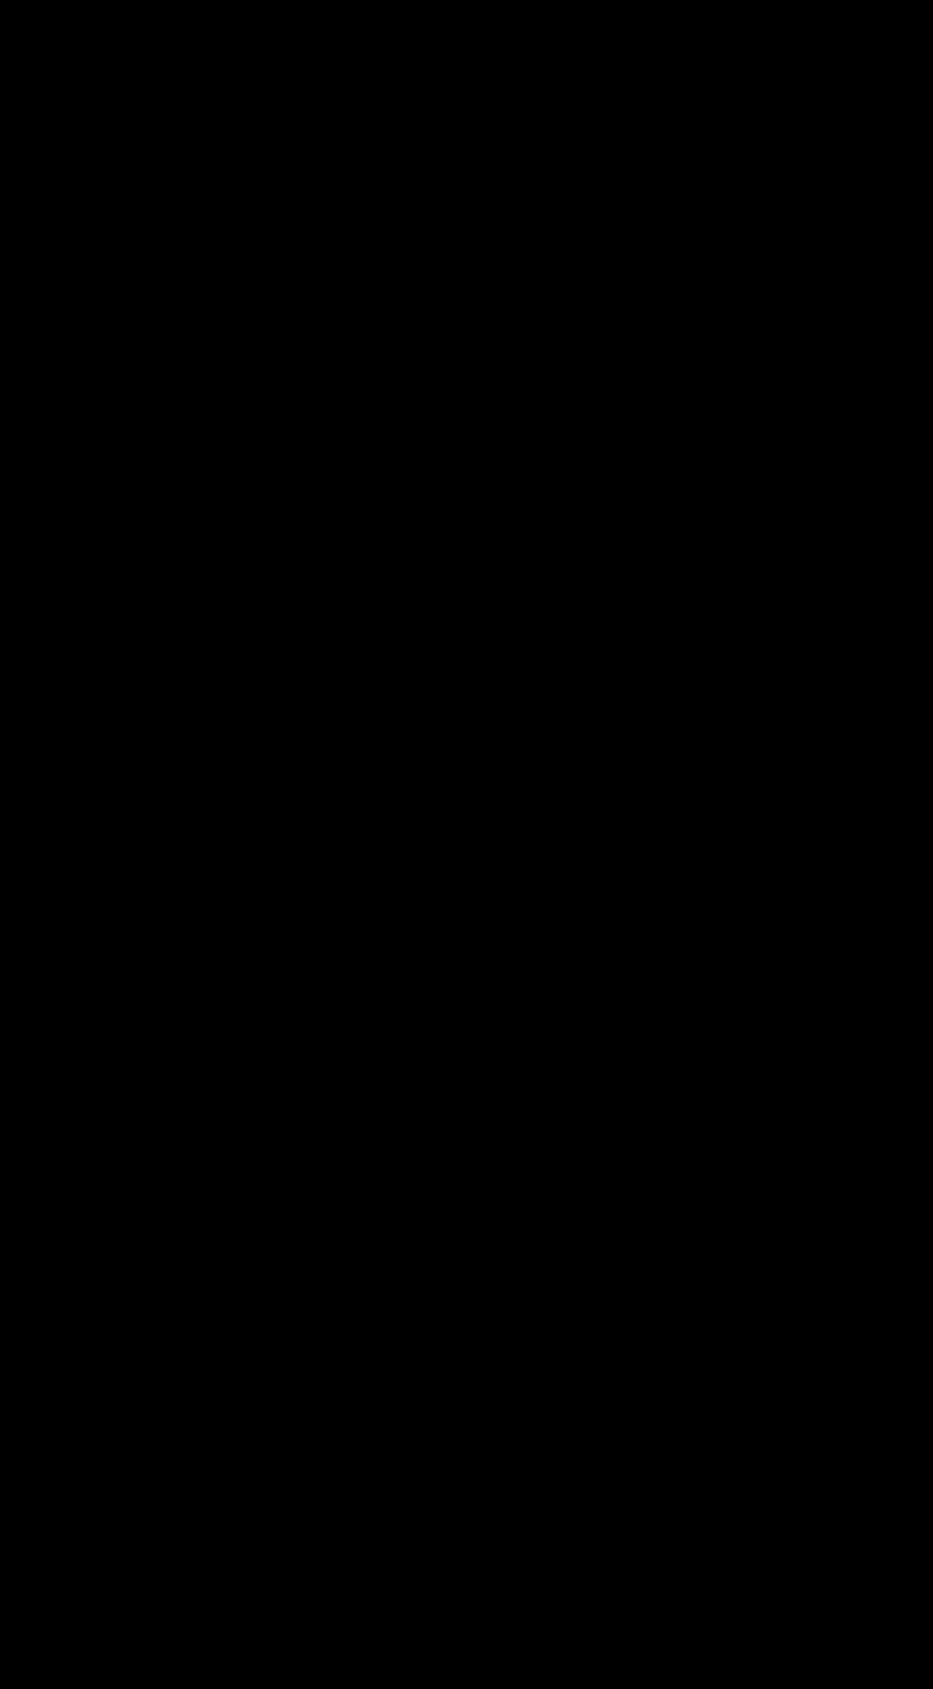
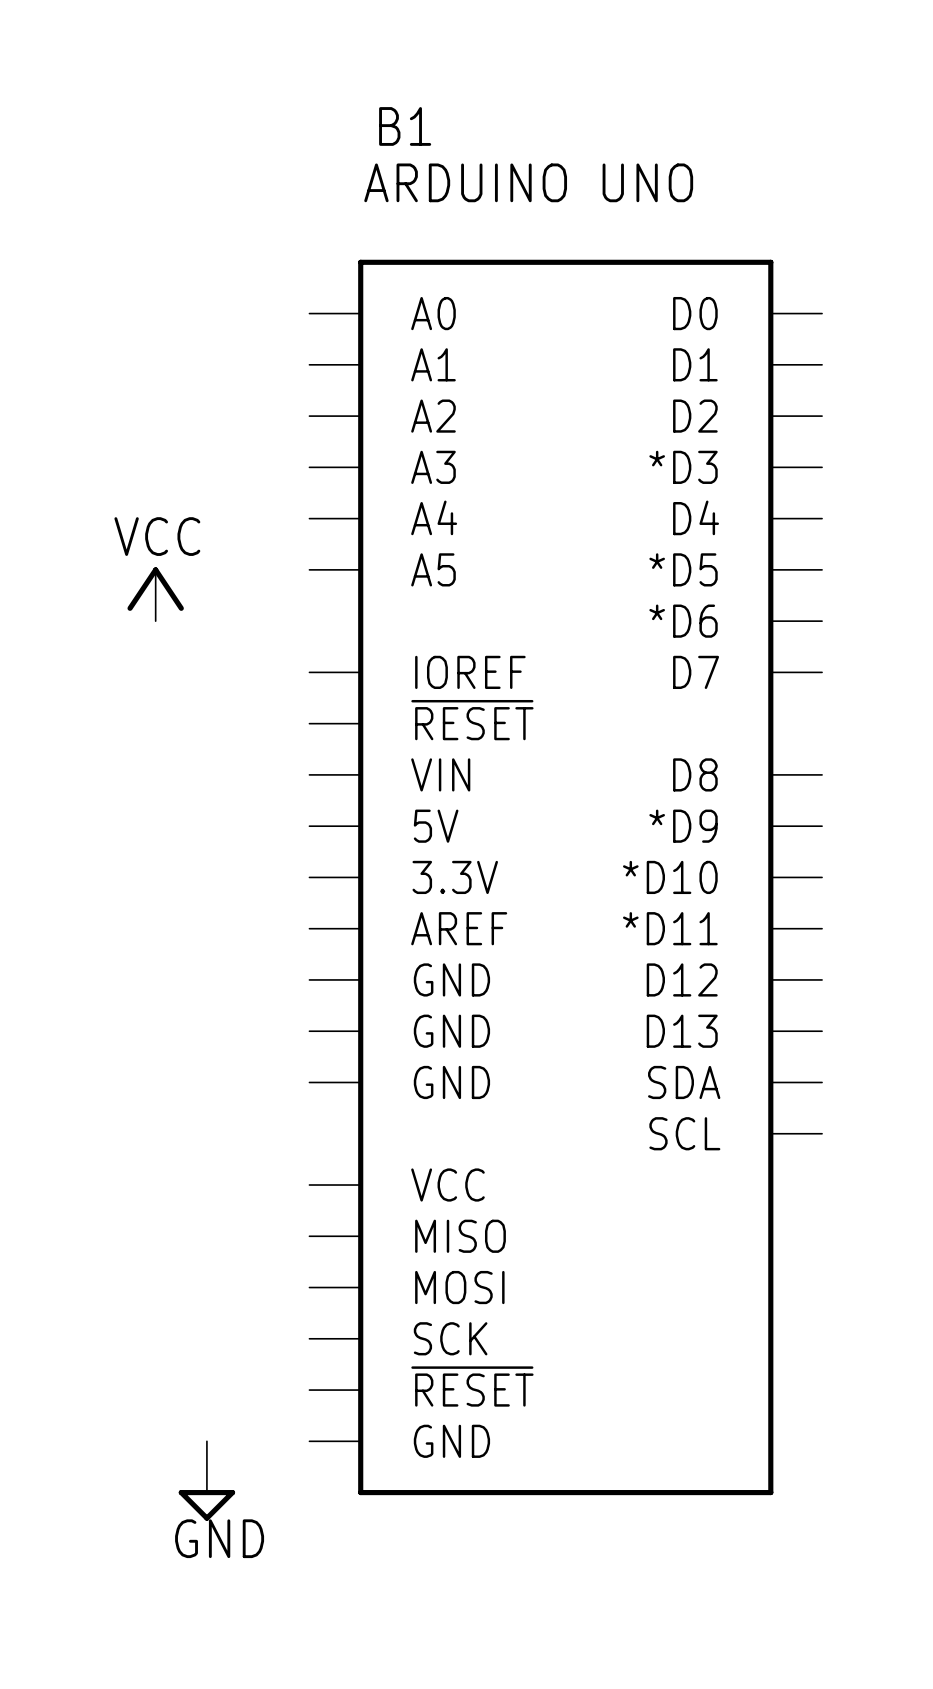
power symbol: none -> VCC (155, 594)
B1: none -> ARDUINO UNO (565, 877)
power symbol: none -> GND (206, 1481)

